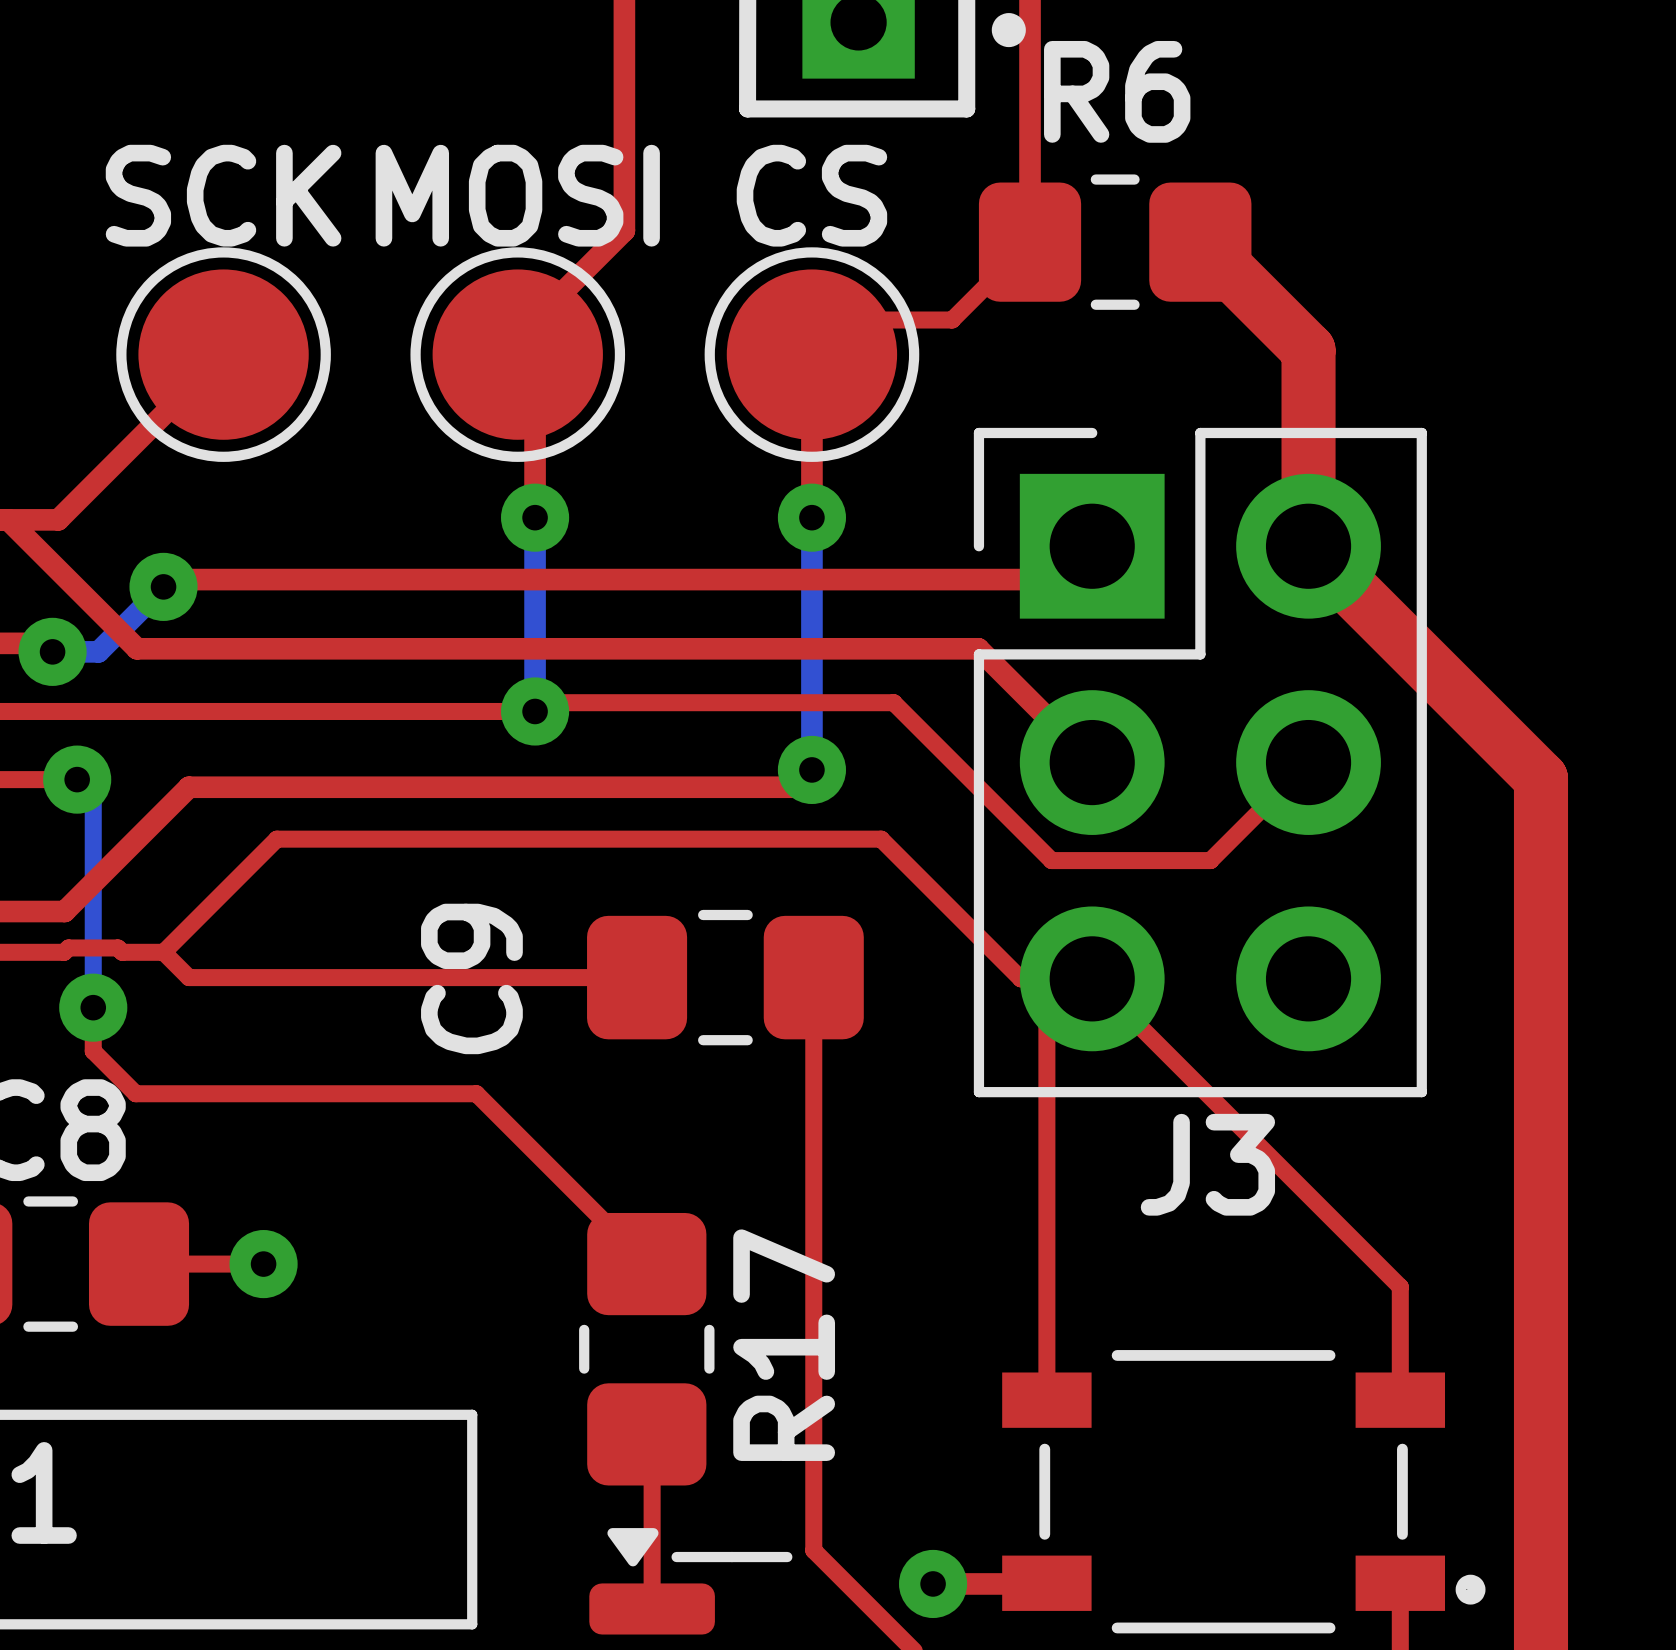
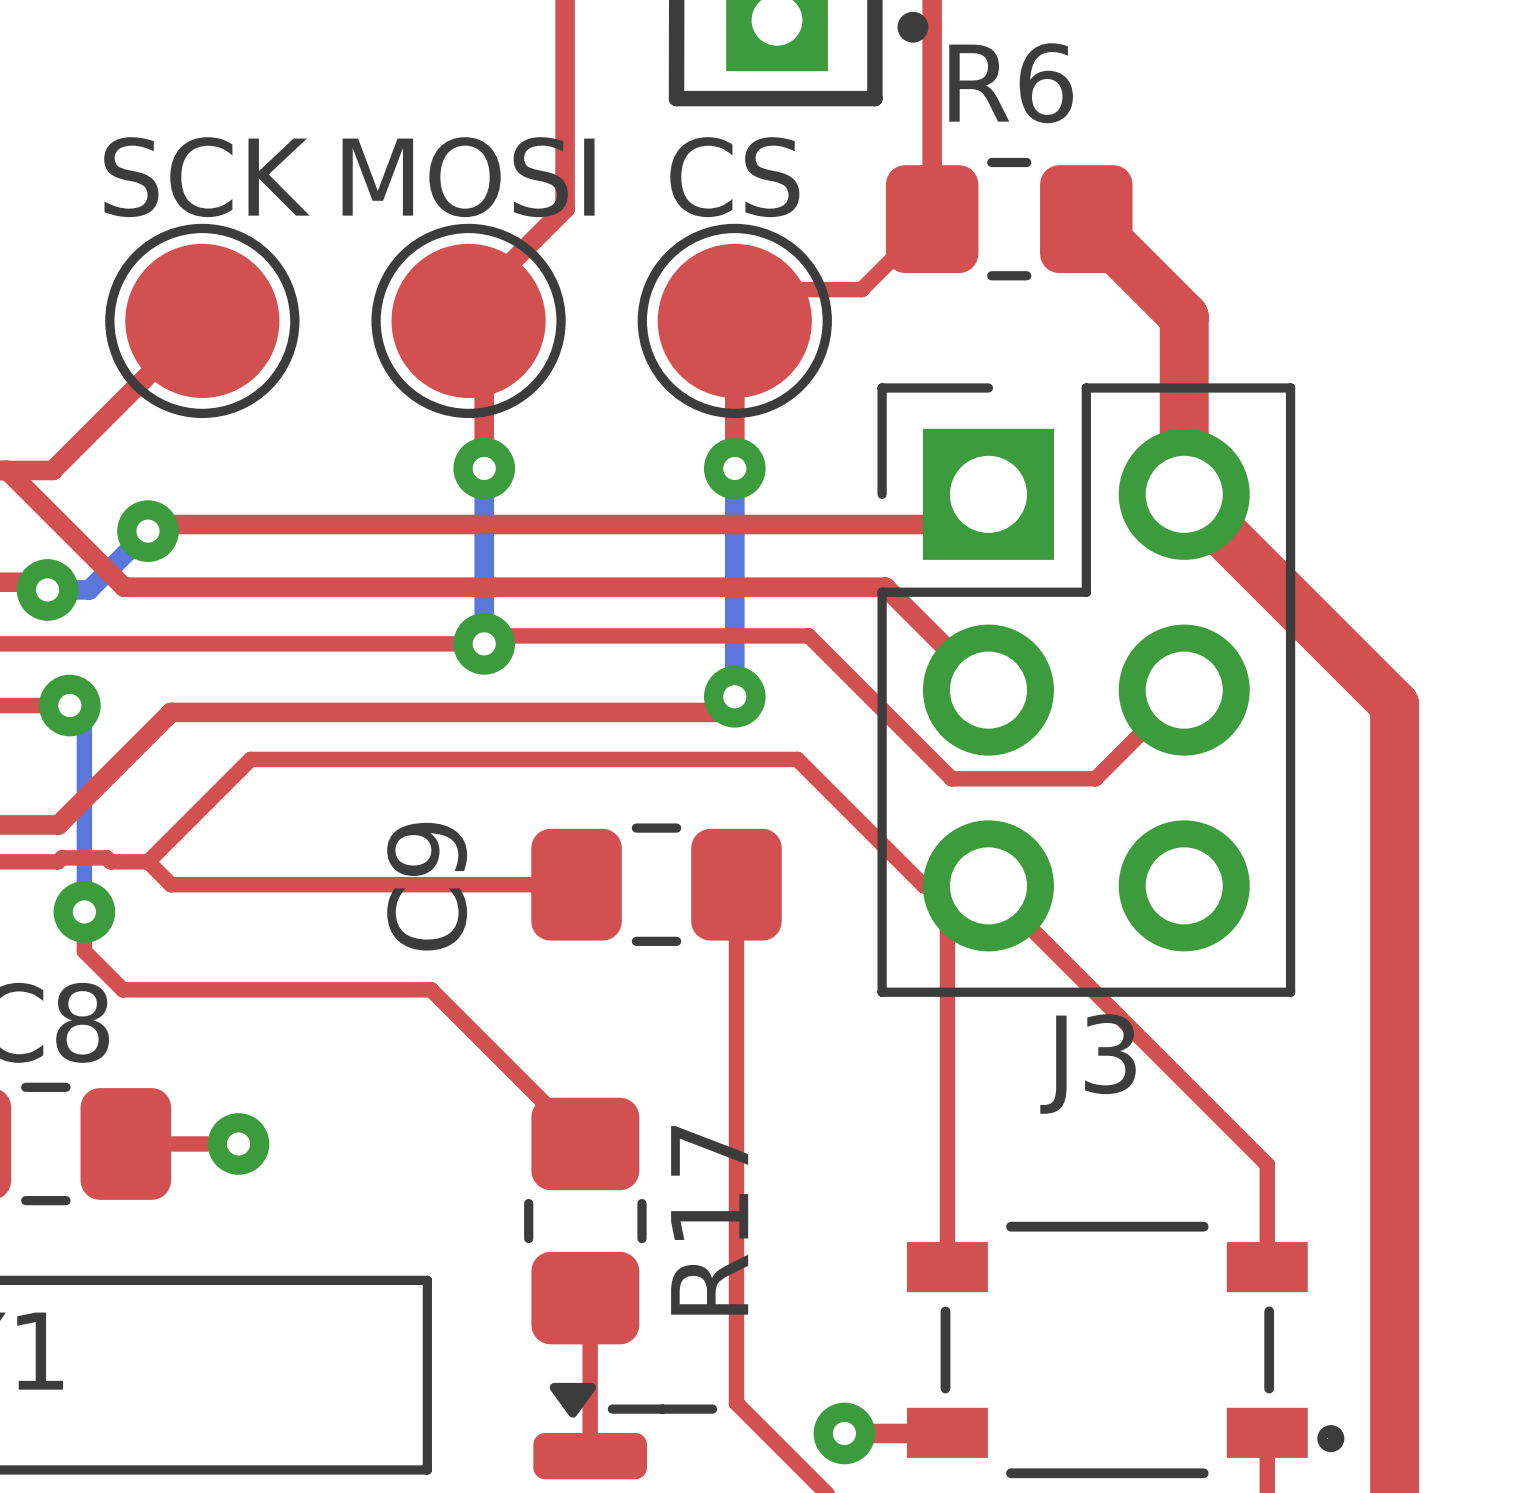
J3 footprint: [973, 427, 1427, 1098] -> [877, 383, 1296, 997]

